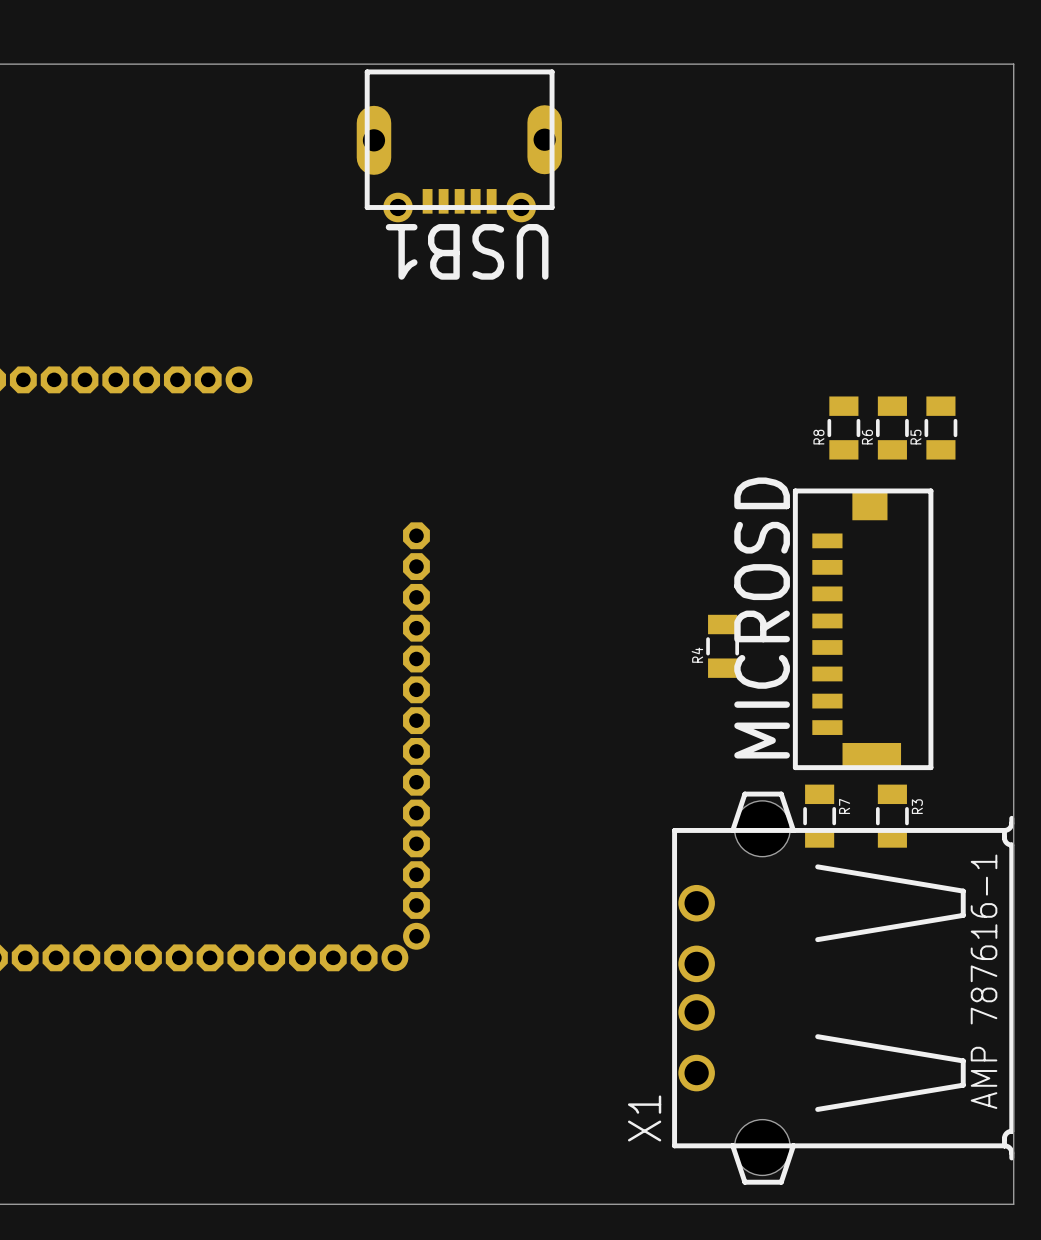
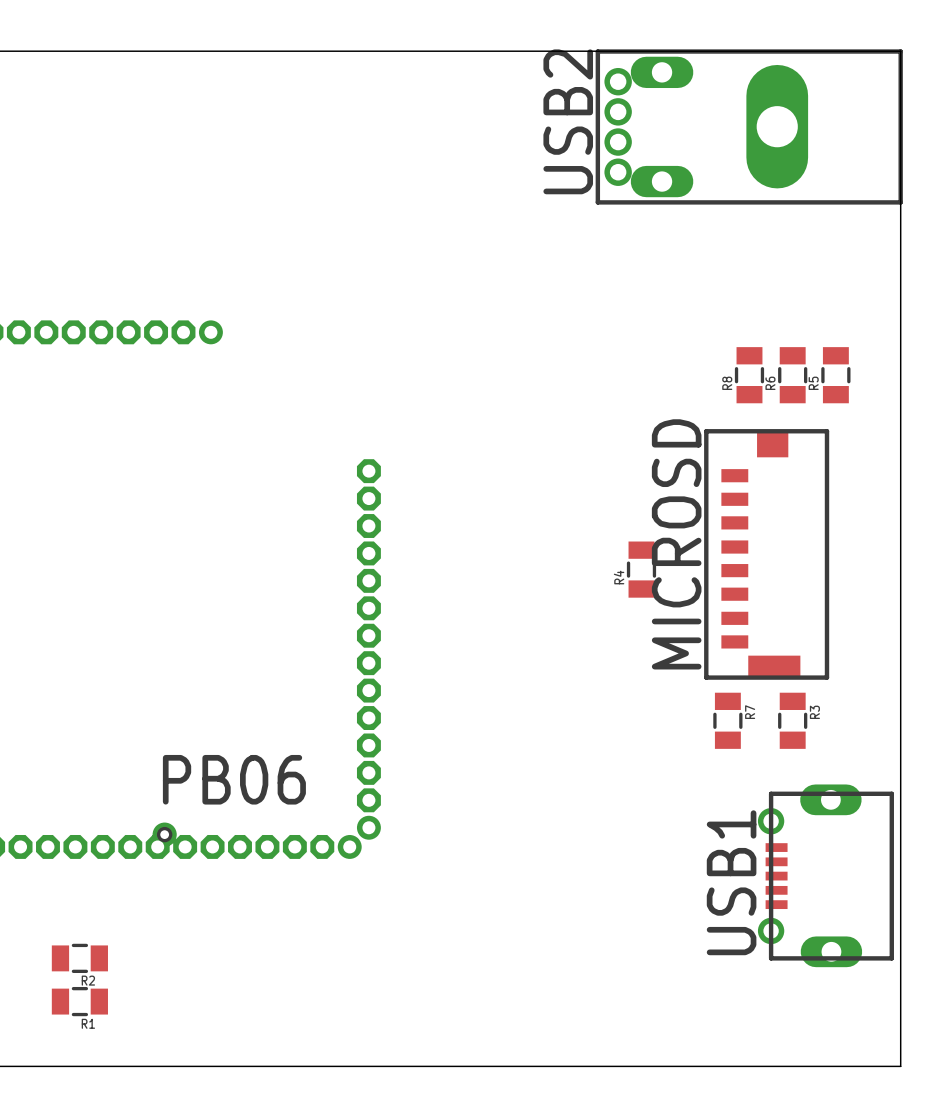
USB1 rotation: 0° (459, 145) -> 90° clockwise (825, 875)
USB1 position: (459, 145) -> (825, 875)
USB2: none -> (749, 126)
PB06: none -> (164, 834)
X1: (843, 988) -> none
R2: none -> (79, 958)
R1: none -> (79, 1001)

